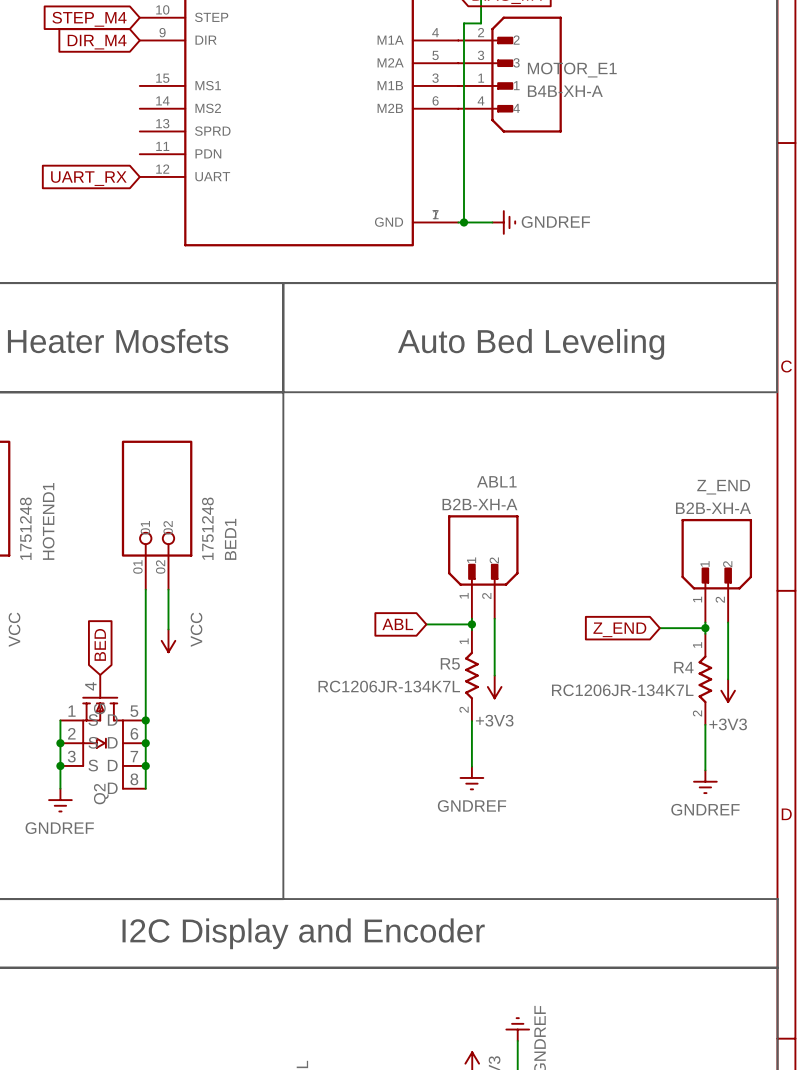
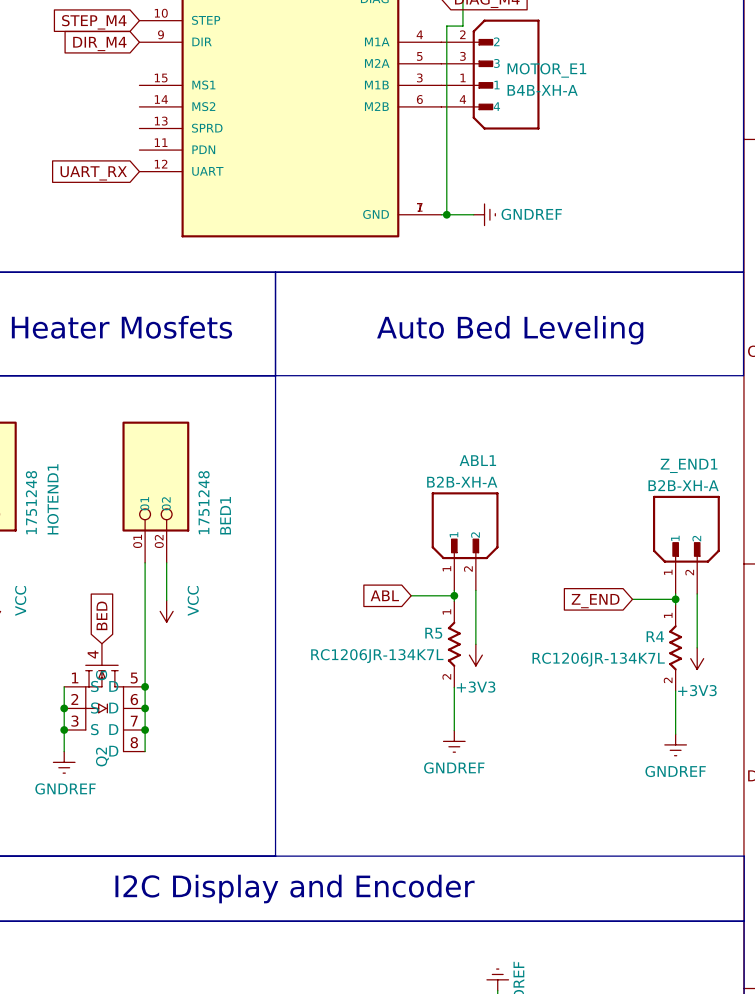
Z_END name: Z_END (723, 487) -> Z_END1 (689, 465)

